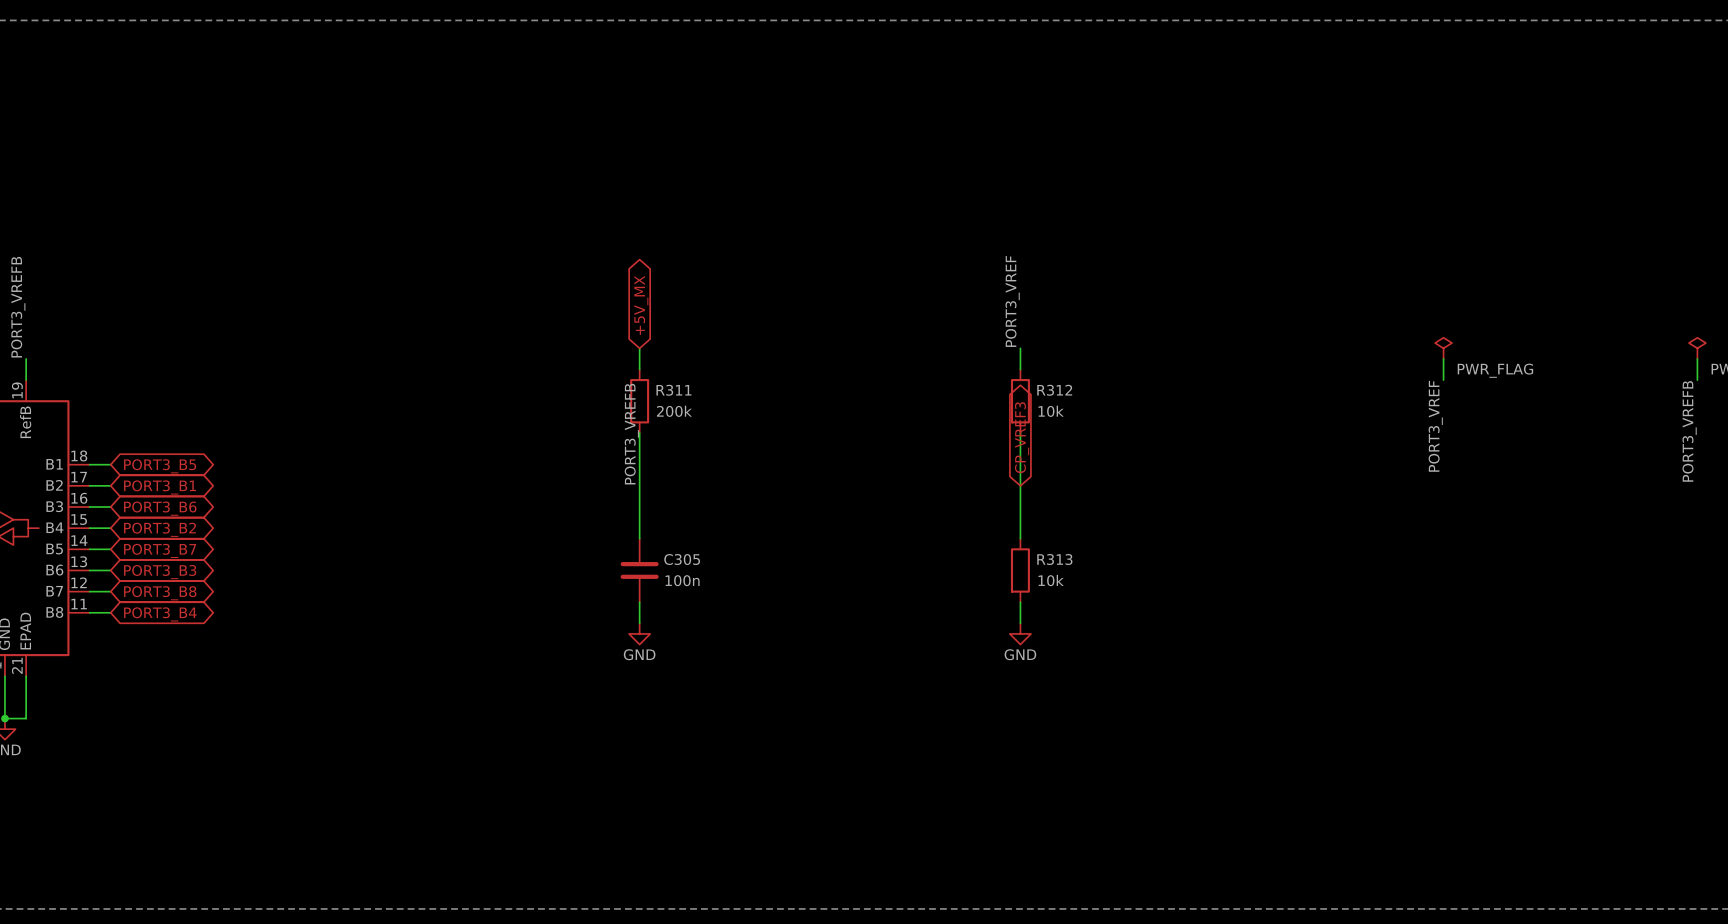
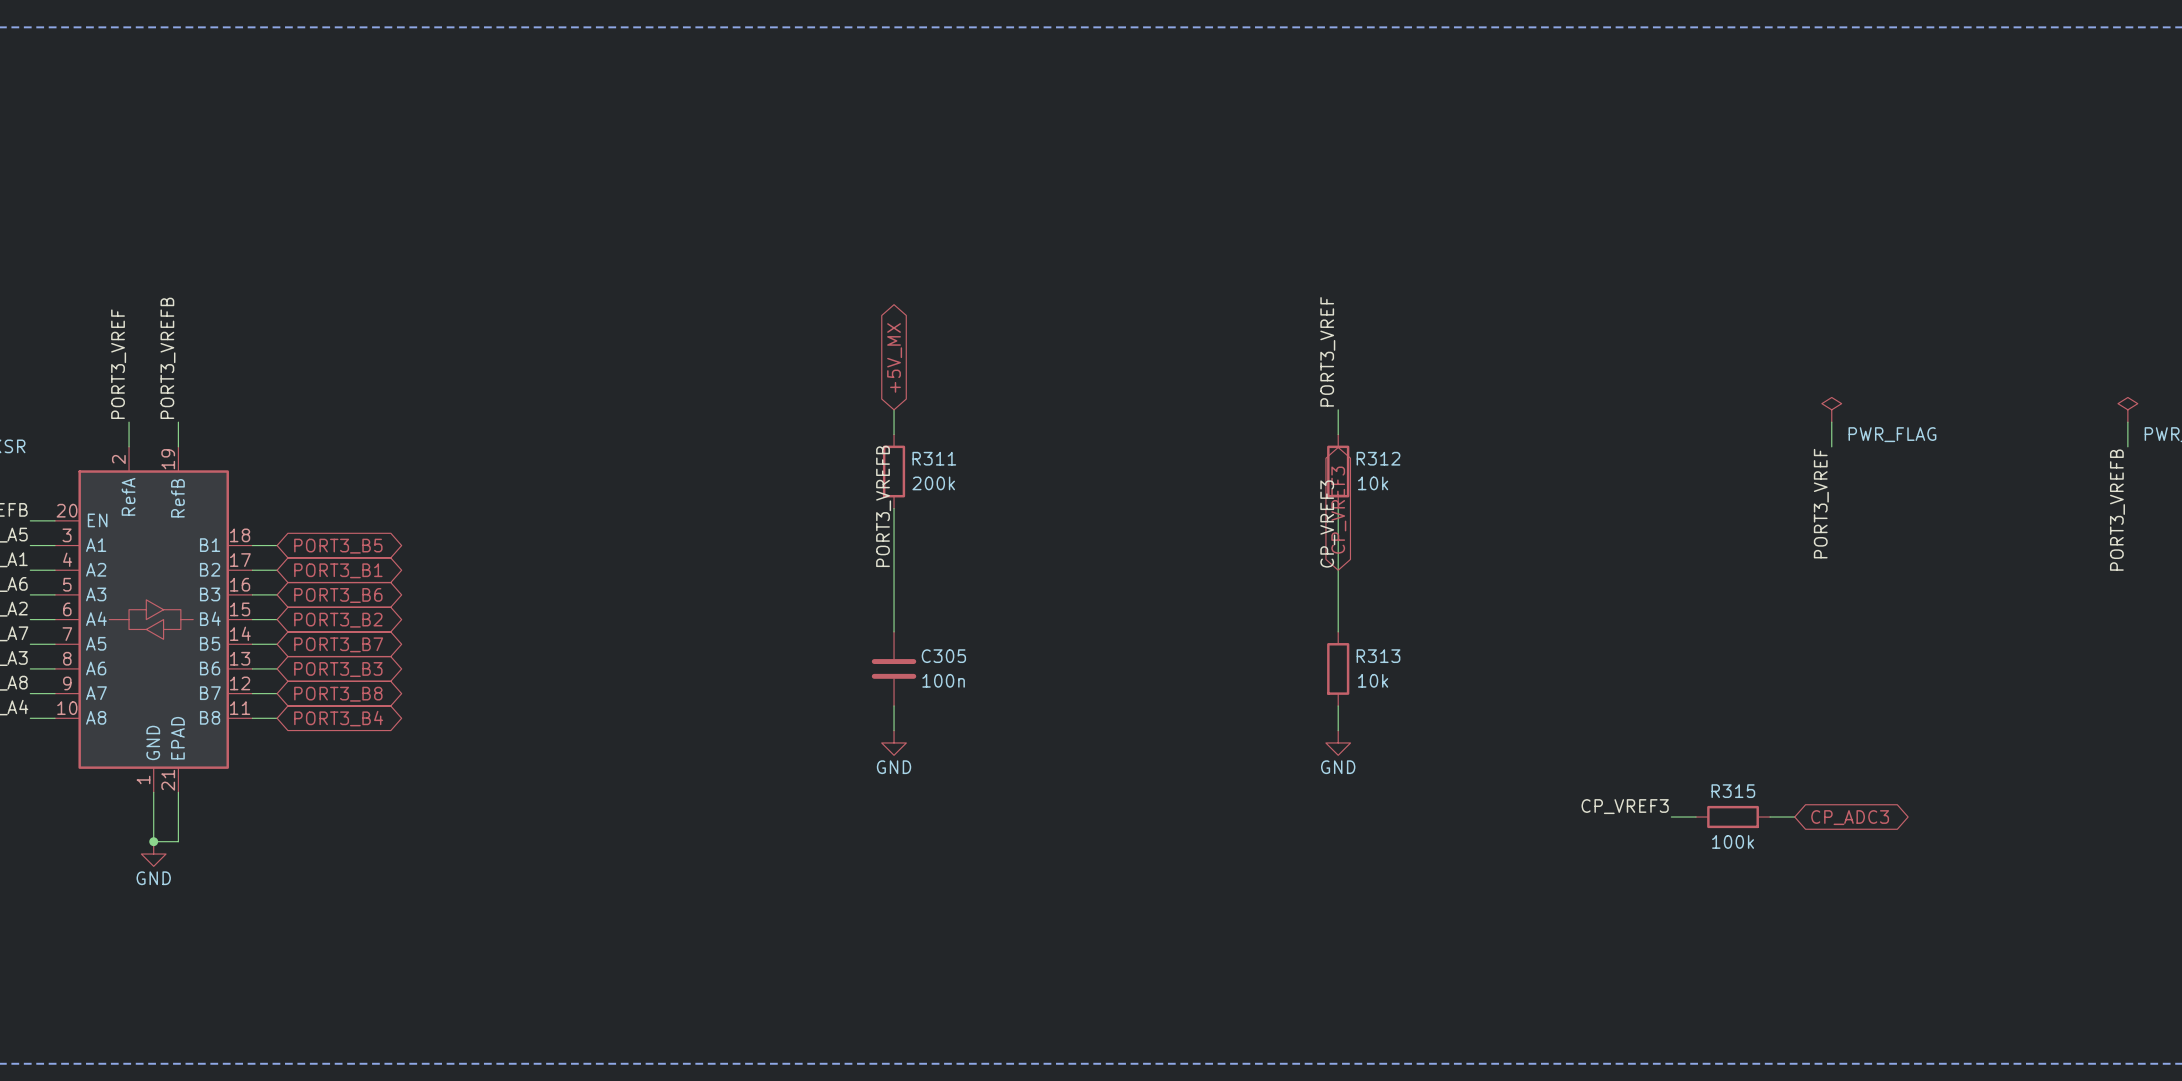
label: none -> CP_VREF3 (1327, 524)
label: none -> CP_VREF3 (1625, 806)
wire: none -> (1671, 817) (1696, 817)
R315: none -> 100k (1733, 817)
wire: none -> (1770, 817) (1794, 817)
global label: none -> CP_ADC3 (1850, 817)

